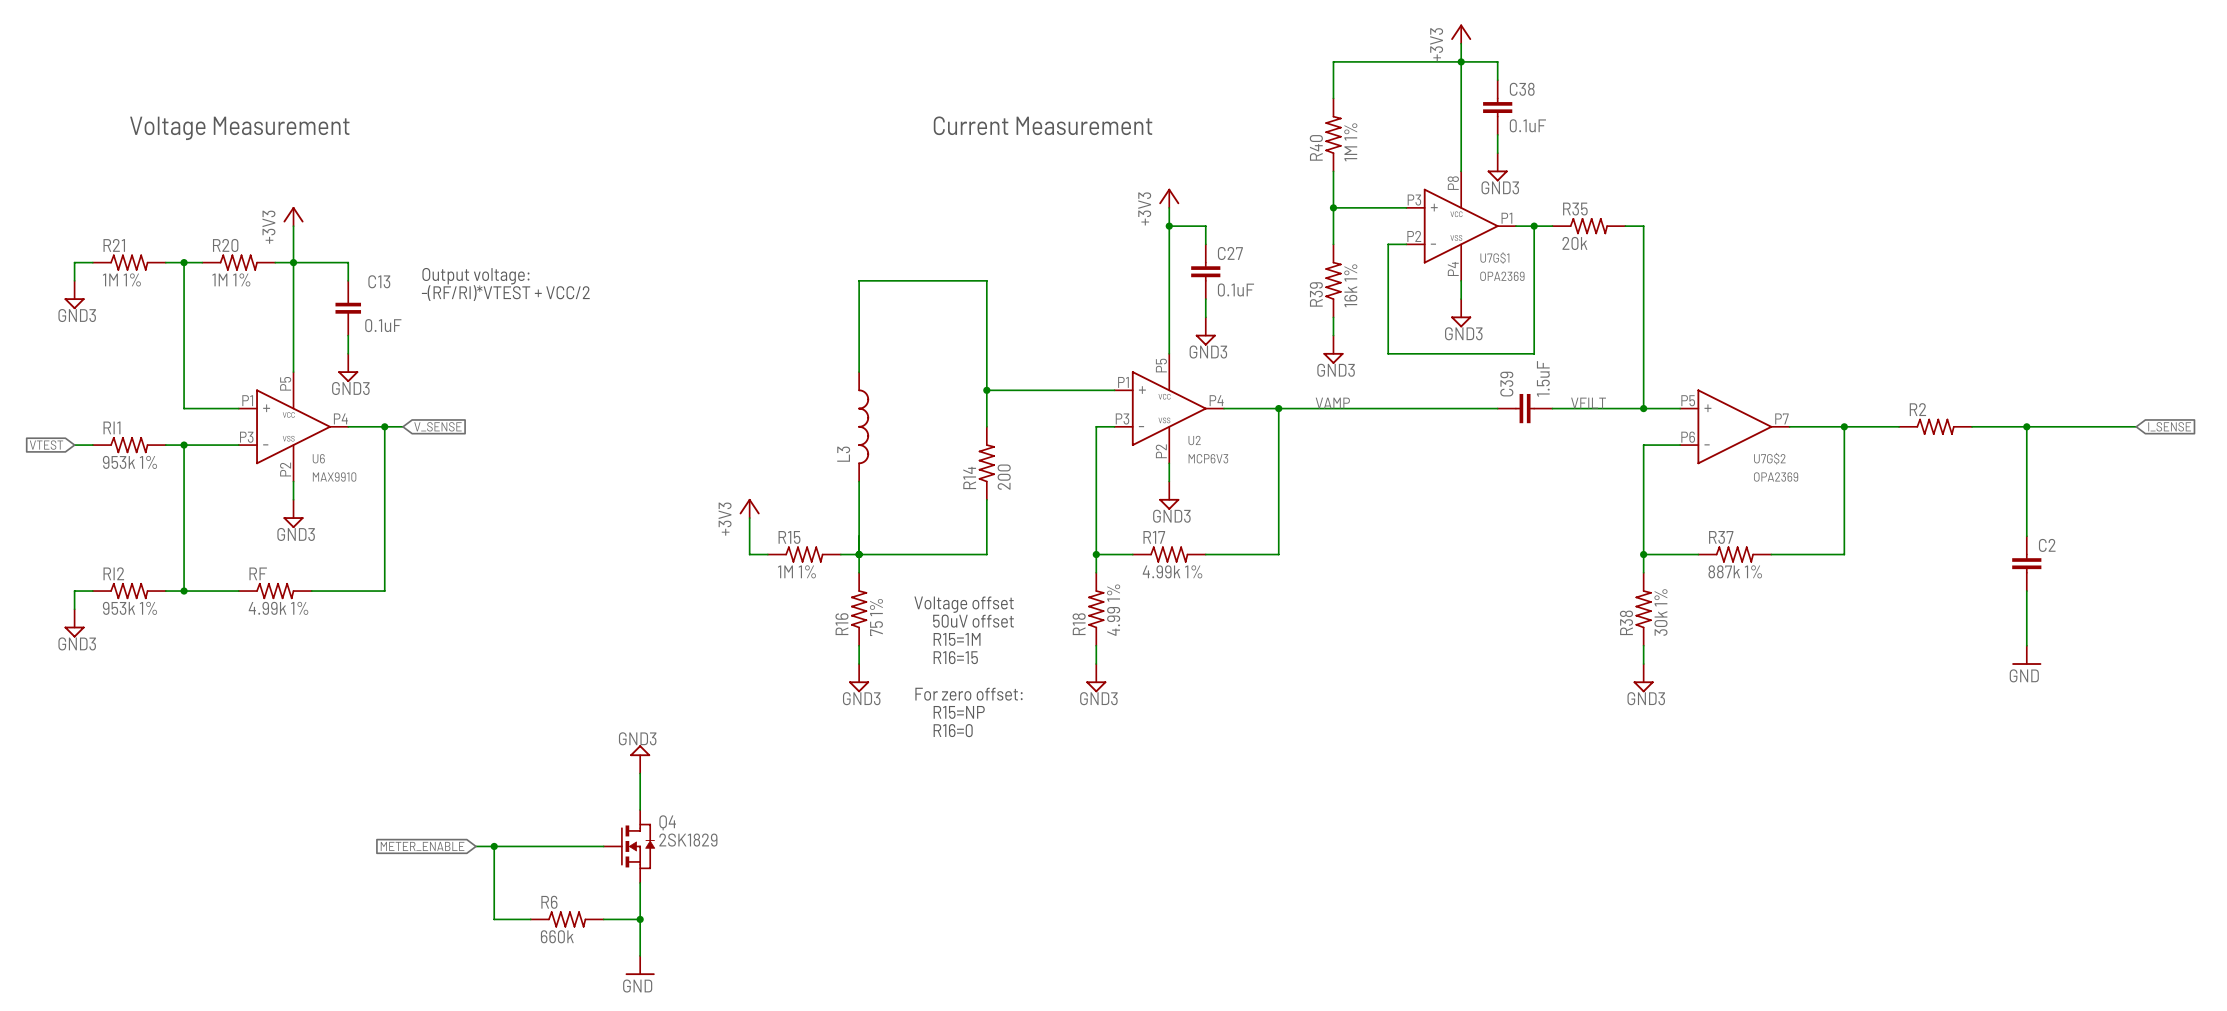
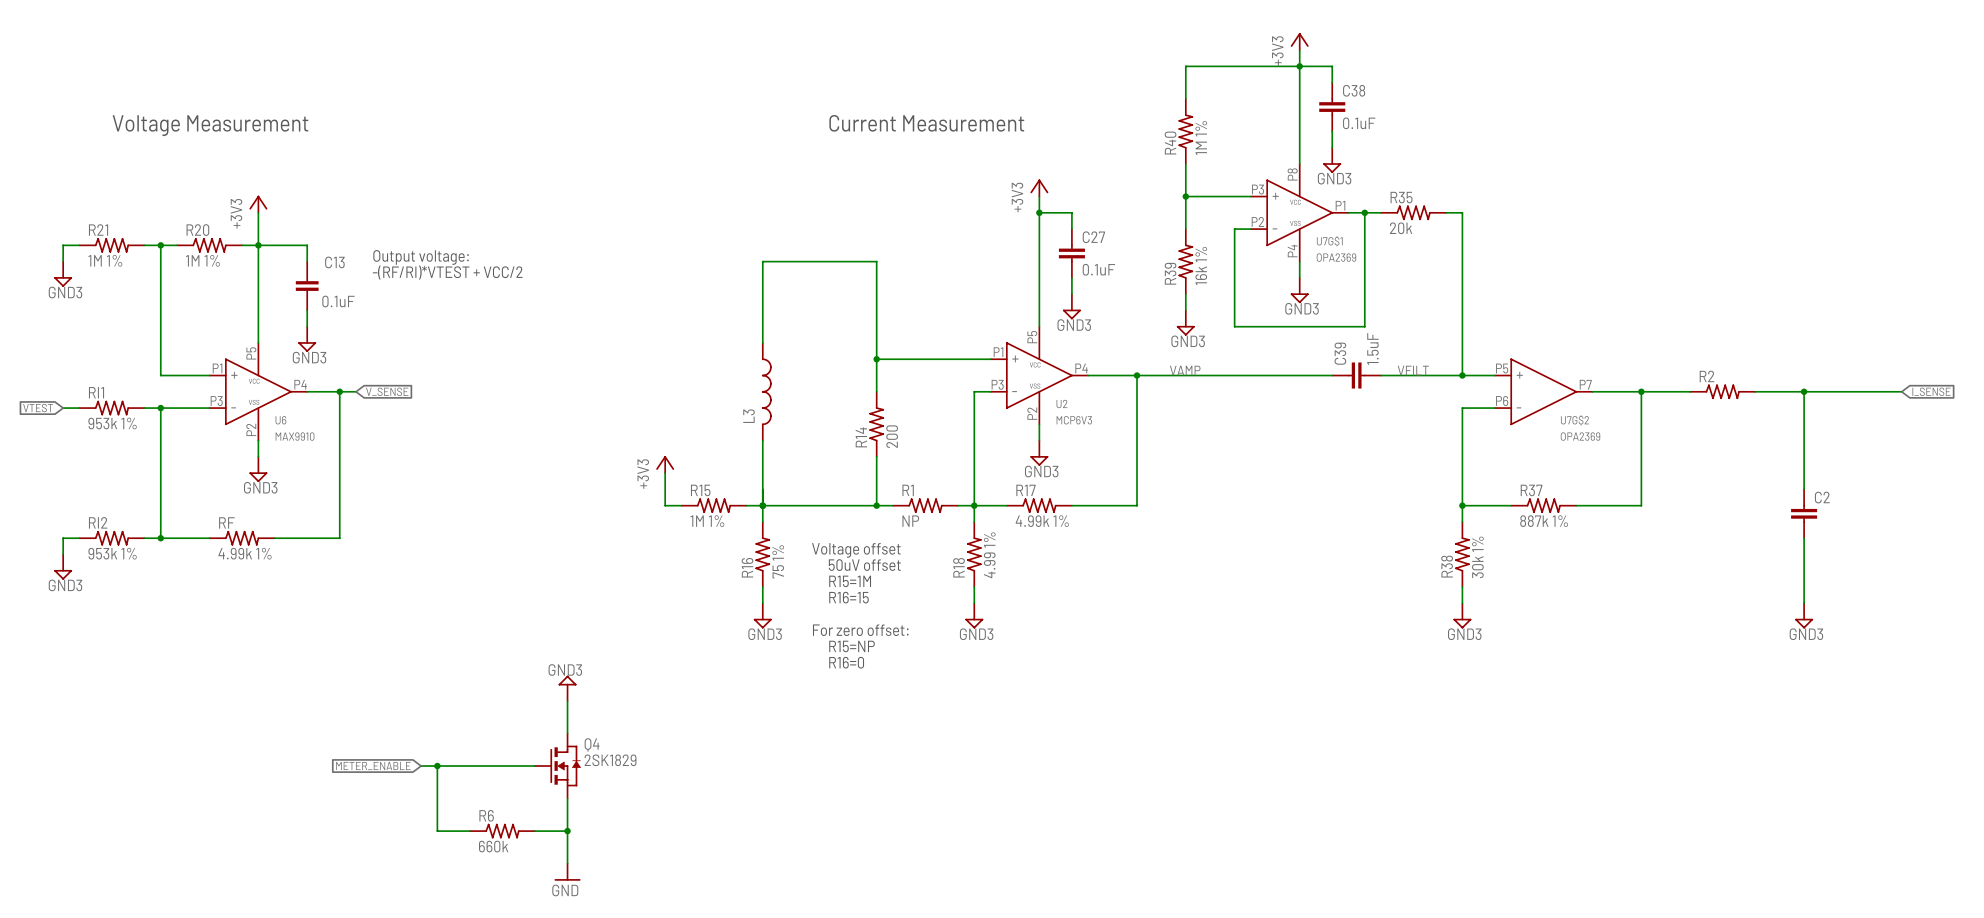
wire: none -> (876, 505) (892, 505)
junction: none -> (876, 505)
R1: none -> NP (925, 505)
wire: none -> (958, 505) (974, 505)
power symbol: GND (2026, 655) -> none
power symbol: none -> GND3 (1804, 615)

